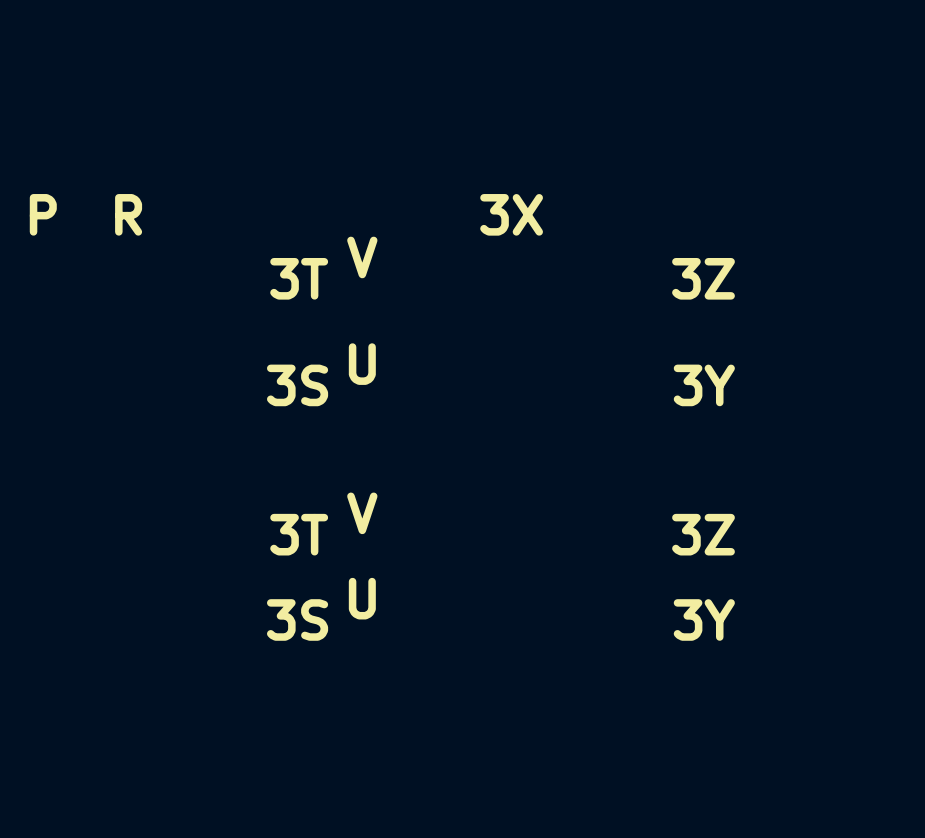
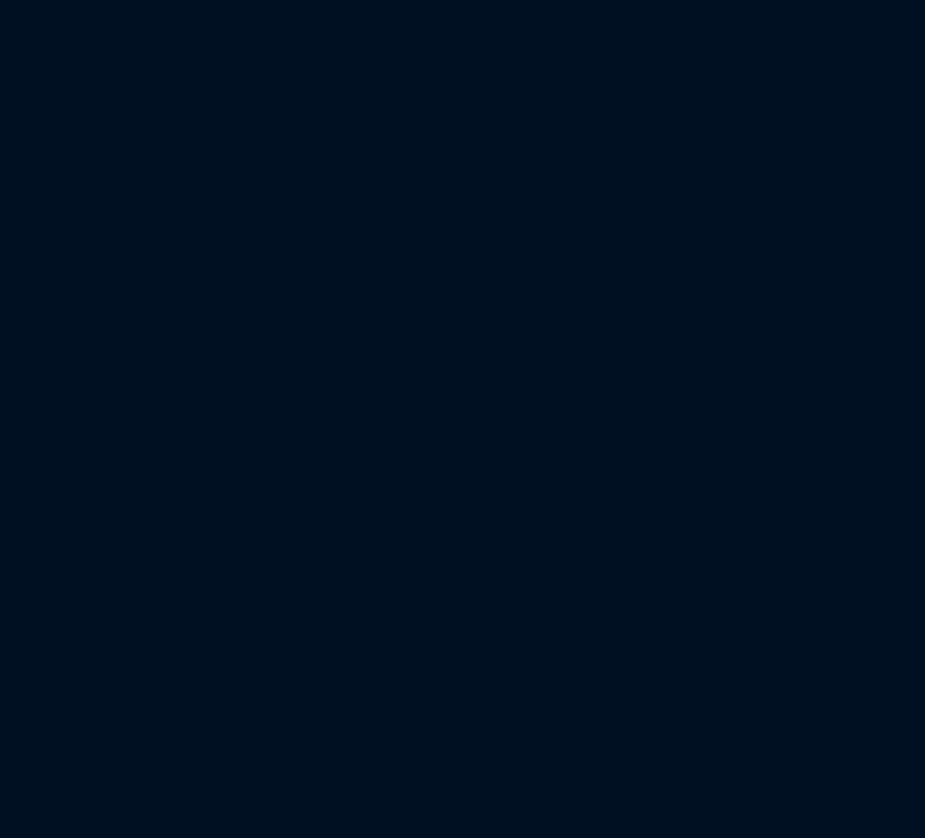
text: P (43, 214) -> none
text: R (128, 214) -> none
text: 3X (511, 214) -> none
text: V (362, 257) -> none
text: 3T (299, 278) -> none
text: 3Z (703, 278) -> none
text: U (362, 364) -> none
text: 3S (297, 385) -> none
text: 3Y (704, 385) -> none
text: V (362, 513) -> none
text: 3T (299, 534) -> none
text: 3Z (703, 534) -> none
text: U (362, 598) -> none
text: 3S (297, 619) -> none
text: 3Y (704, 619) -> none

